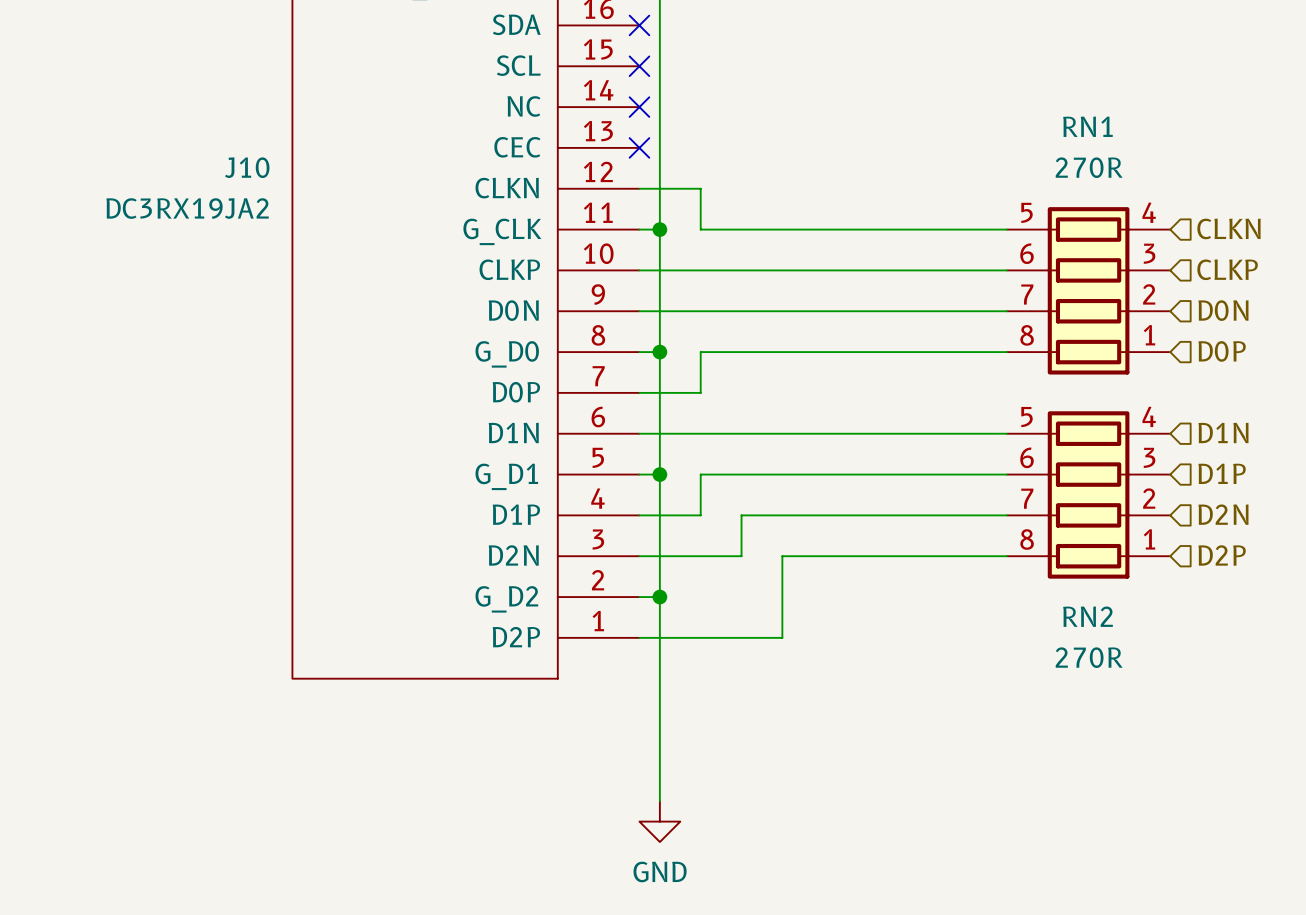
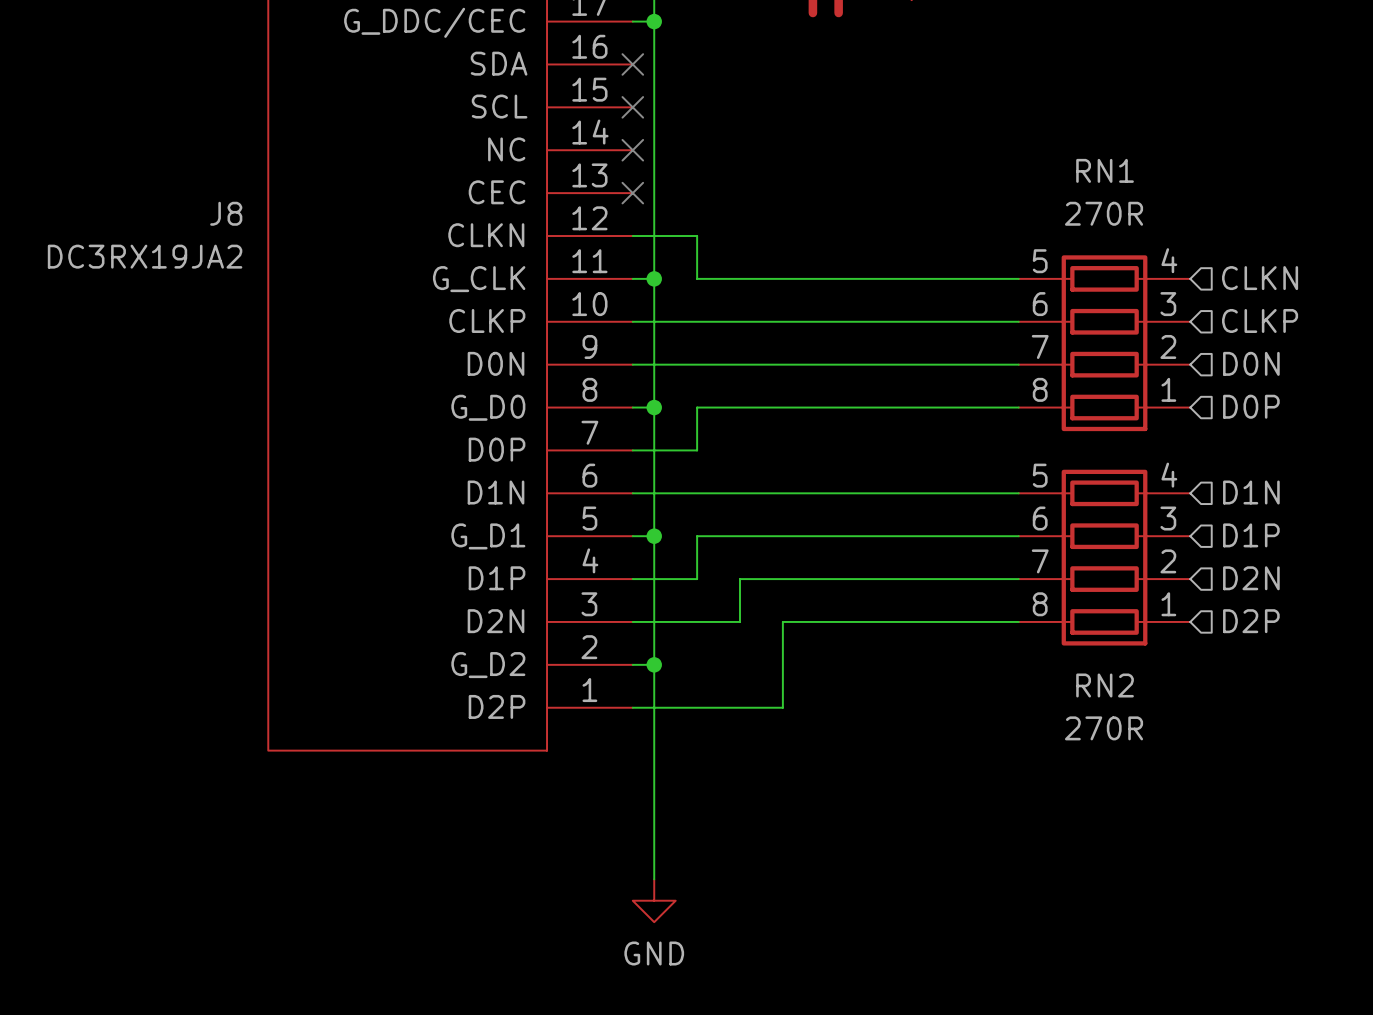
J10 name: J10 (247, 167) -> J8 (226, 213)

